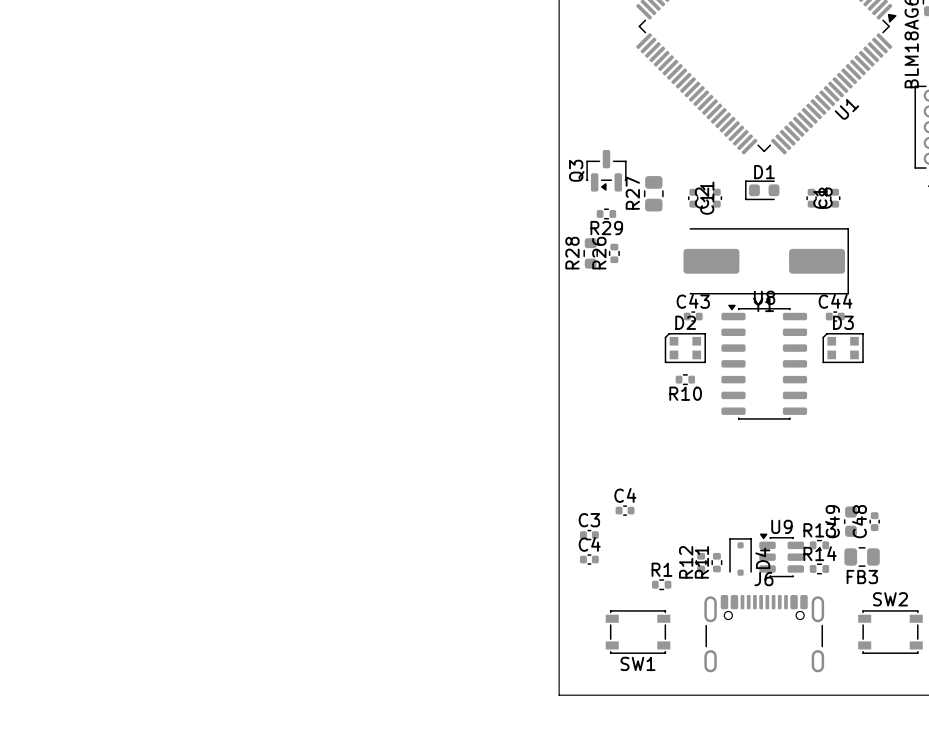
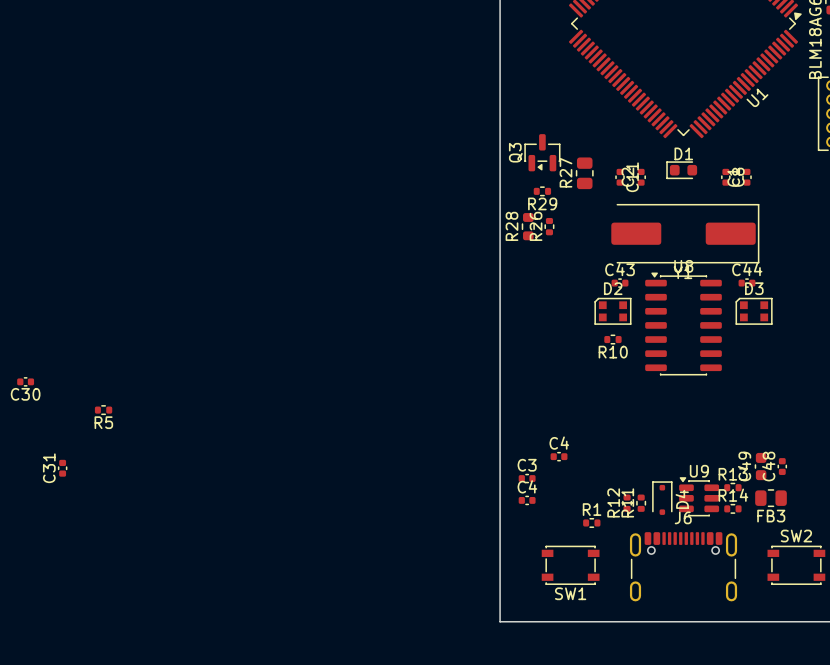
C30: none -> (25, 381)
R5: none -> (103, 410)
C31: none -> (62, 468)

